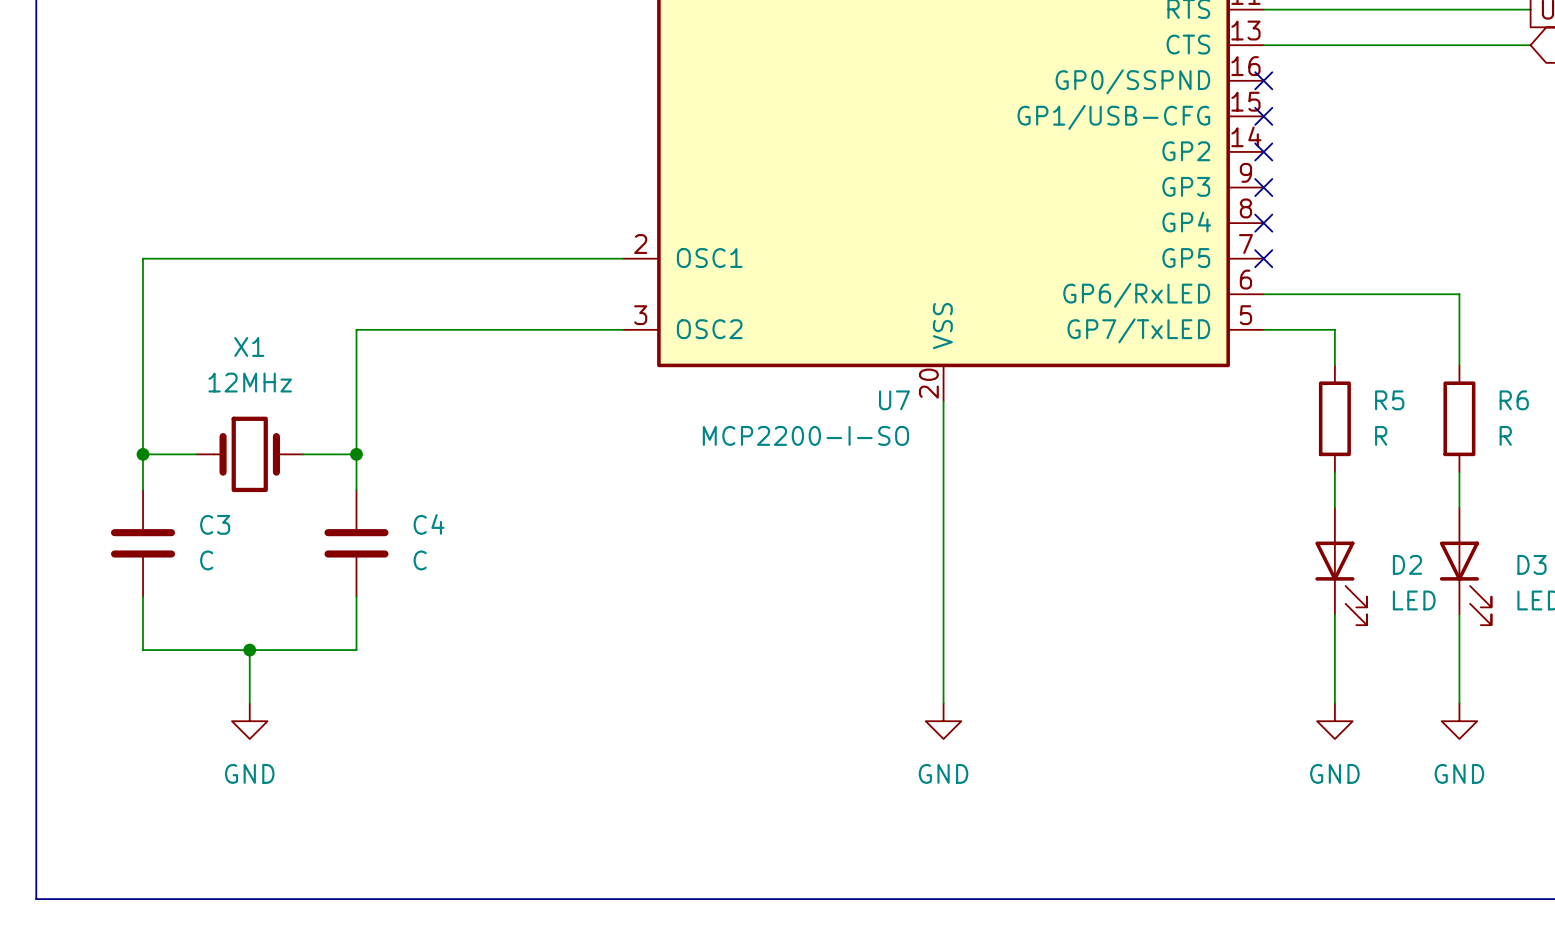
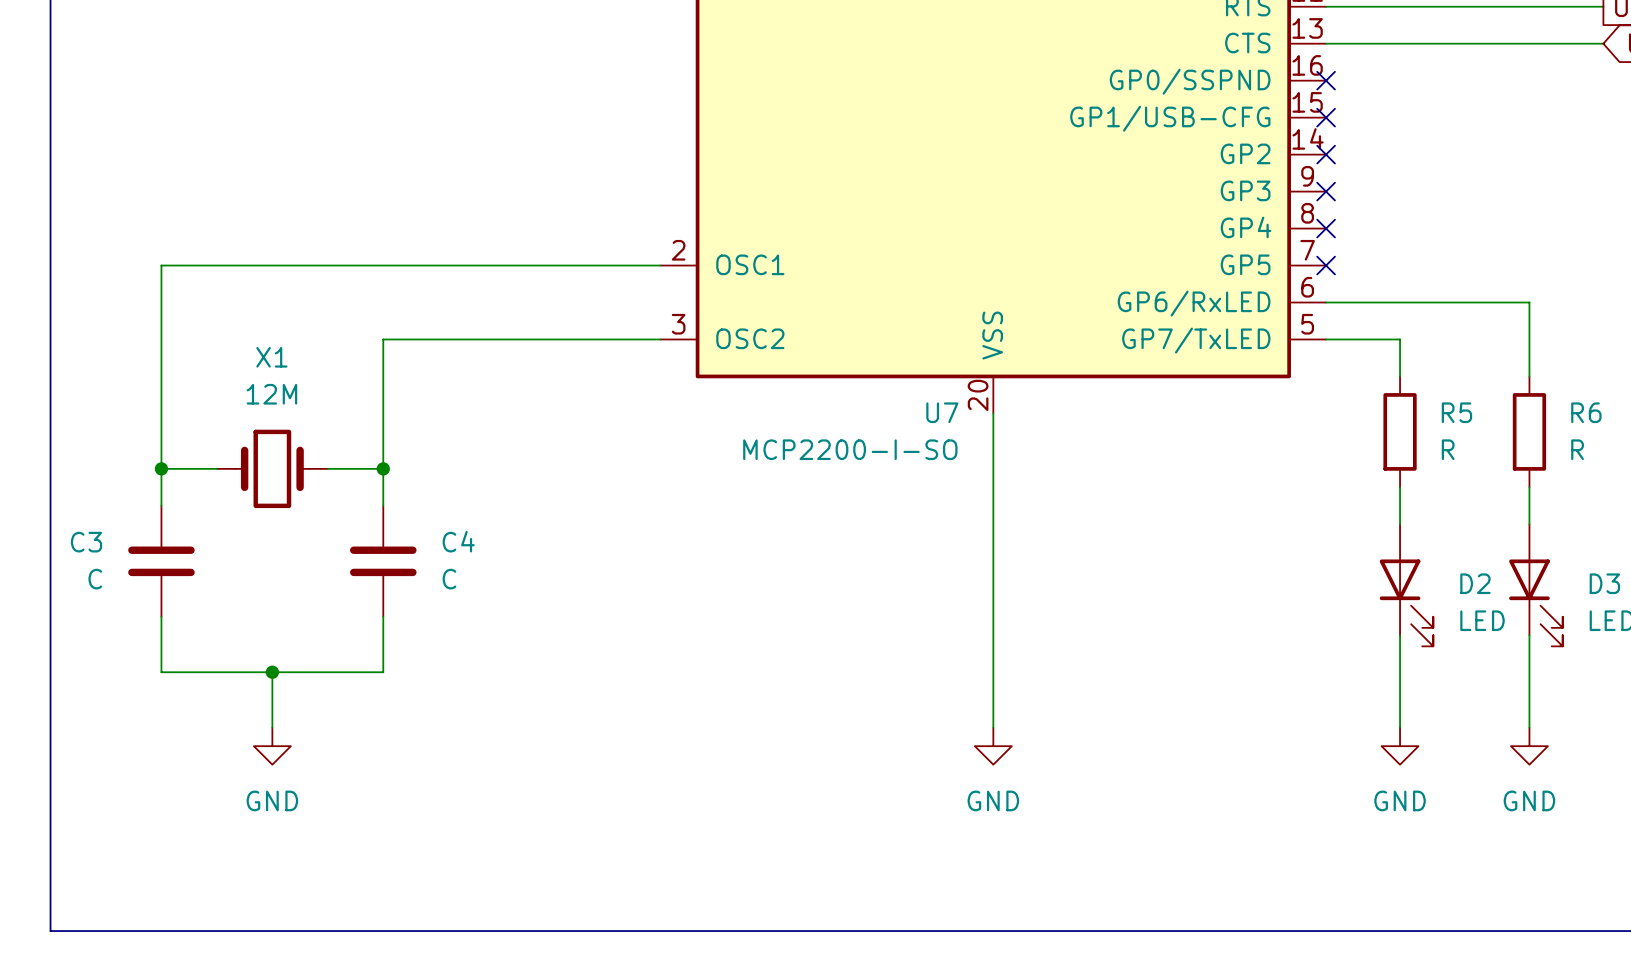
X1 value: 12MHz (250, 382) -> 12M (271, 394)
C3 name position: C3 (215, 524) -> C3 (86, 542)
C3 value position: C (206, 560) -> C (95, 579)

